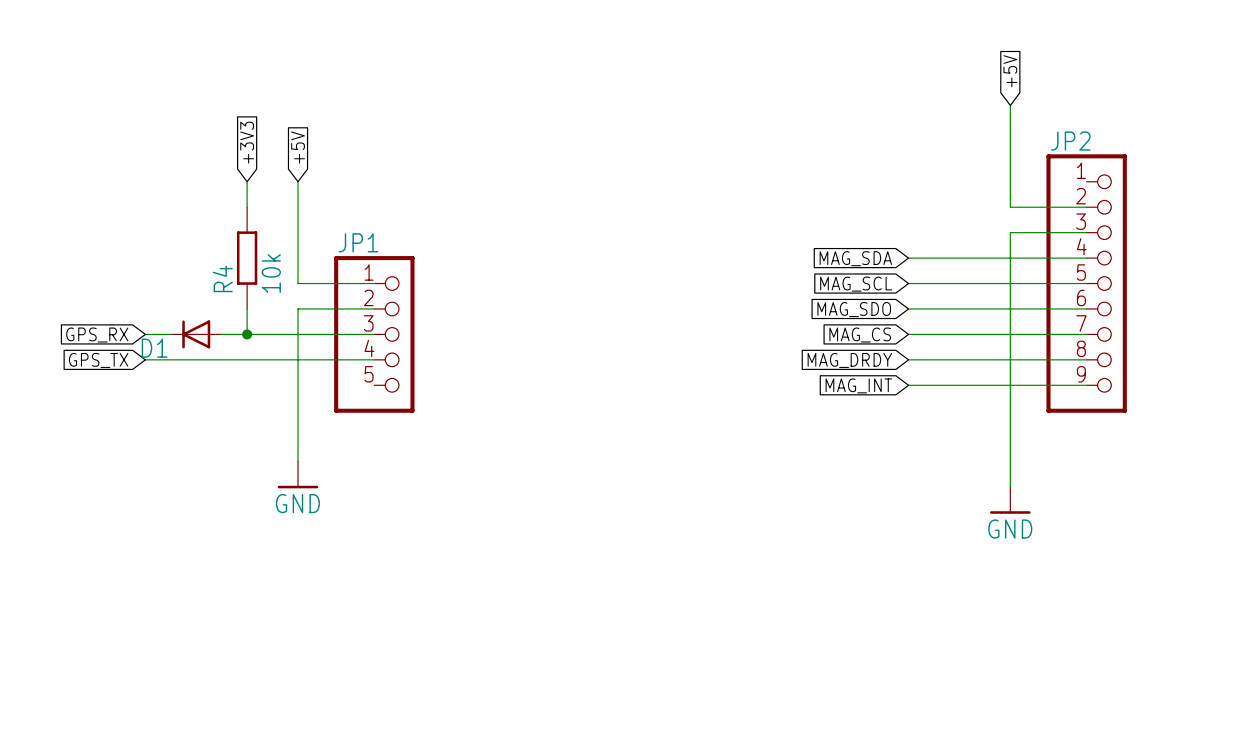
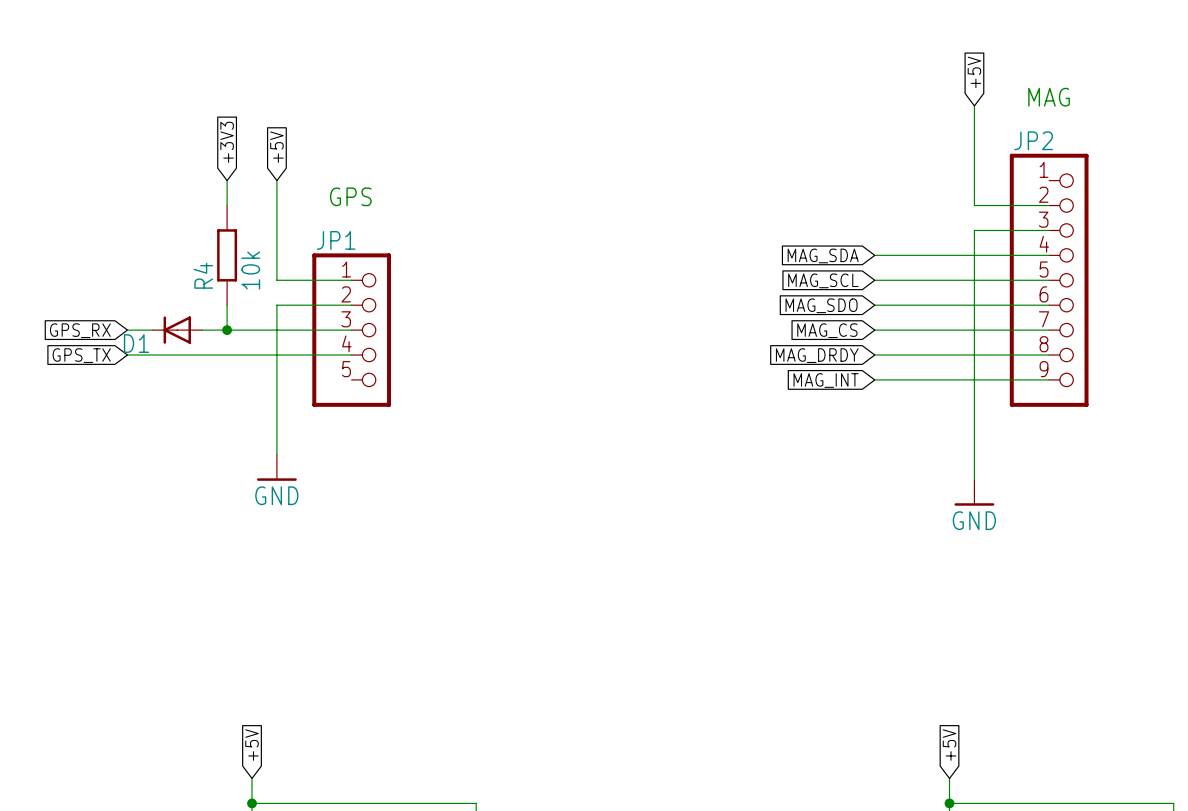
text: none -> MAG (1049, 97)
text: none -> GPS (350, 196)

